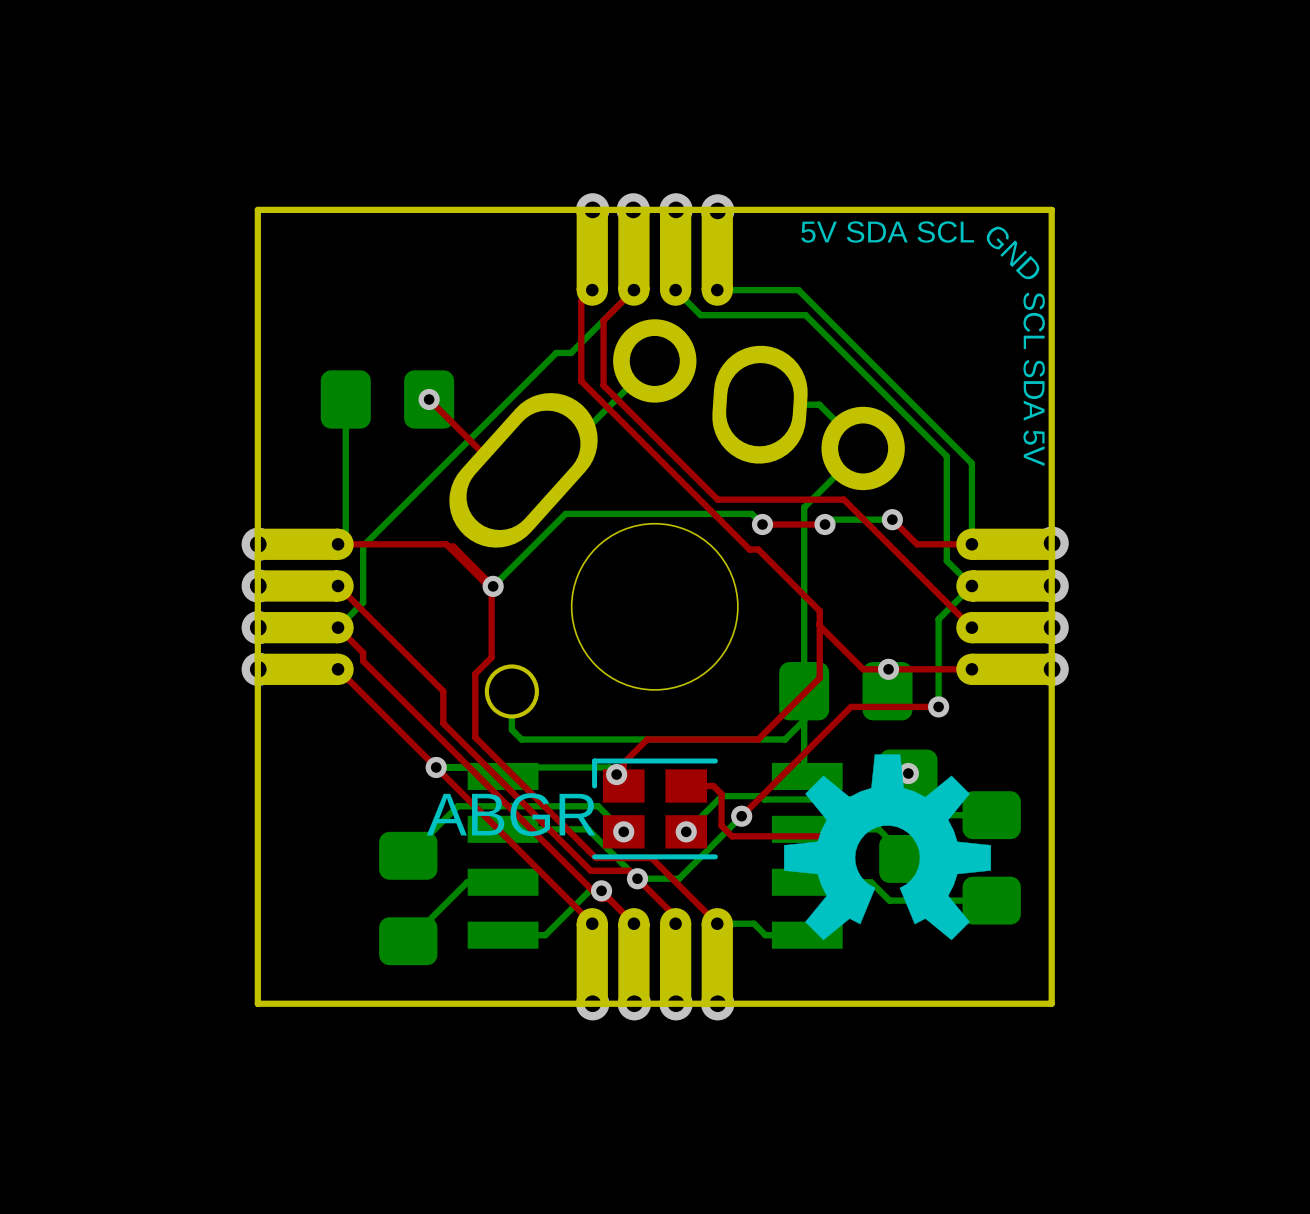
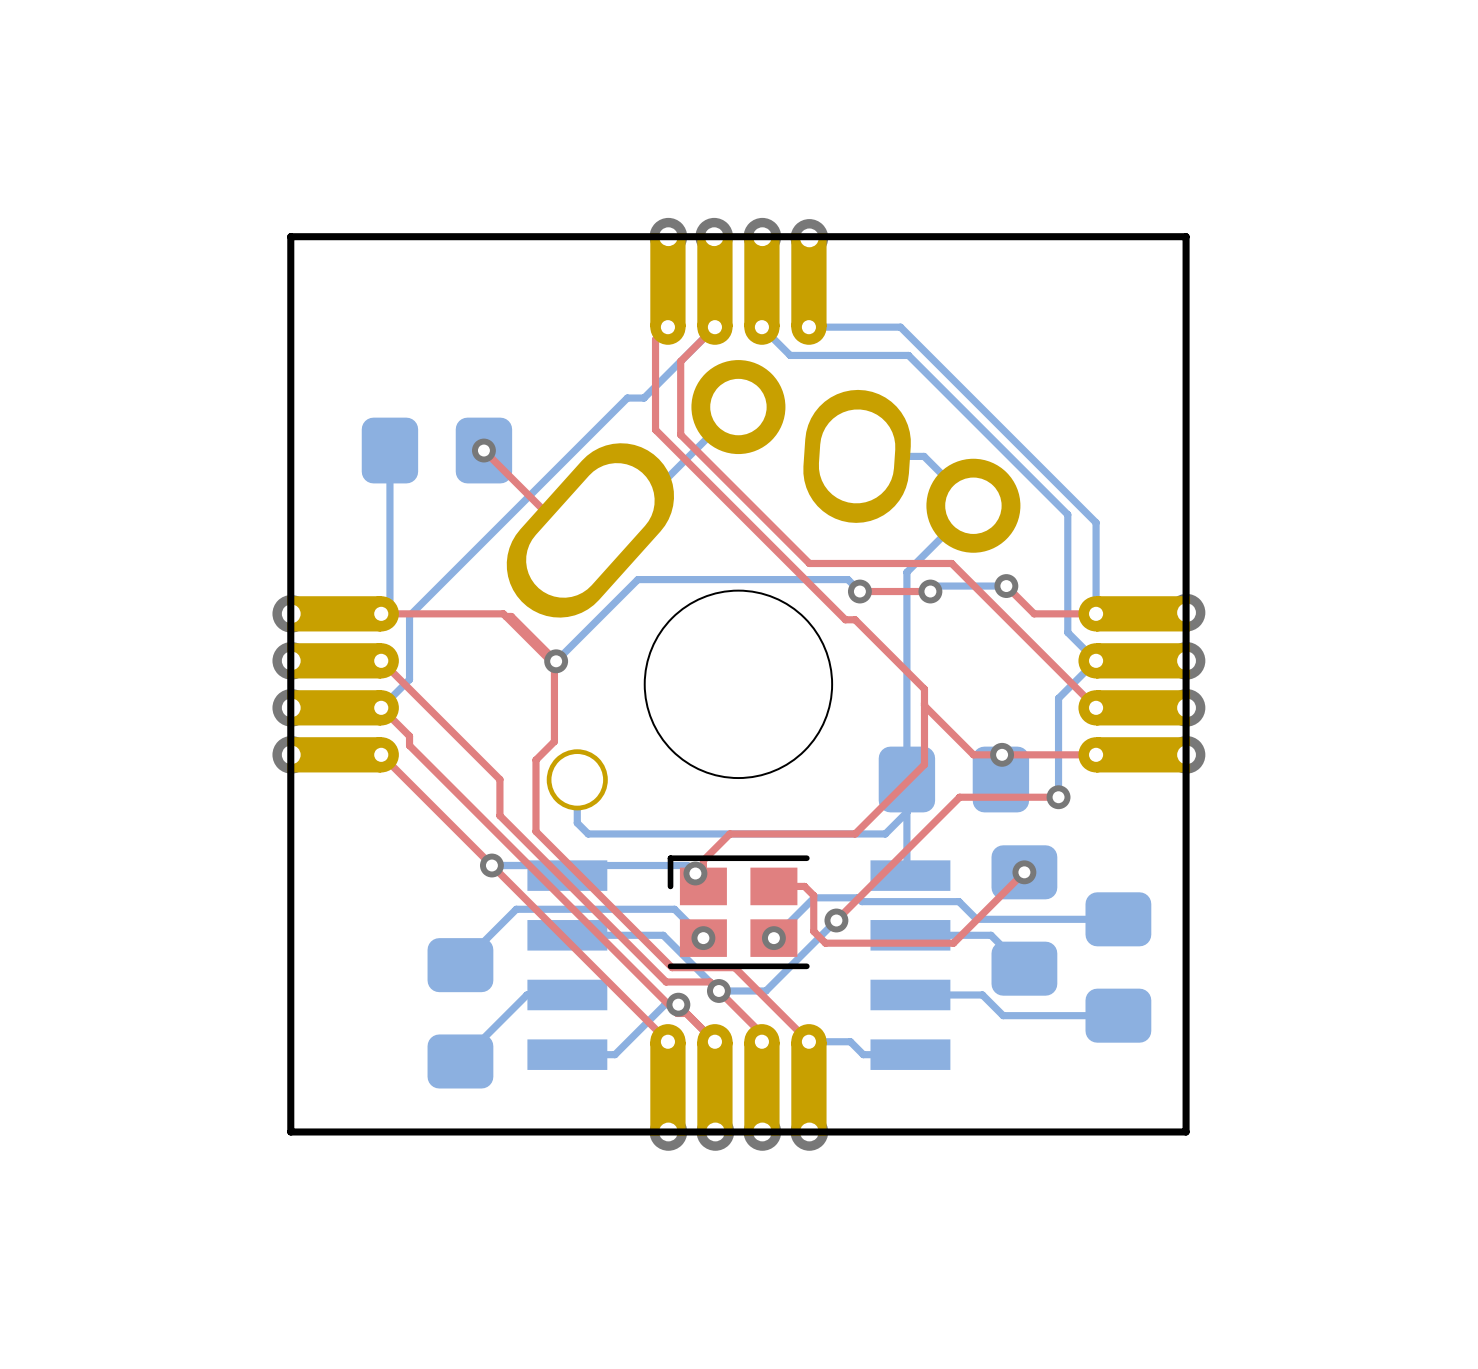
text: 5V SDA SCL (887, 232) -> none
text: GND (1012, 253) -> none
text: SCL SDA 5V (1034, 379) -> none
drawing: [784, 754, 992, 941] -> none
part value: ABGR (511, 814) -> none

